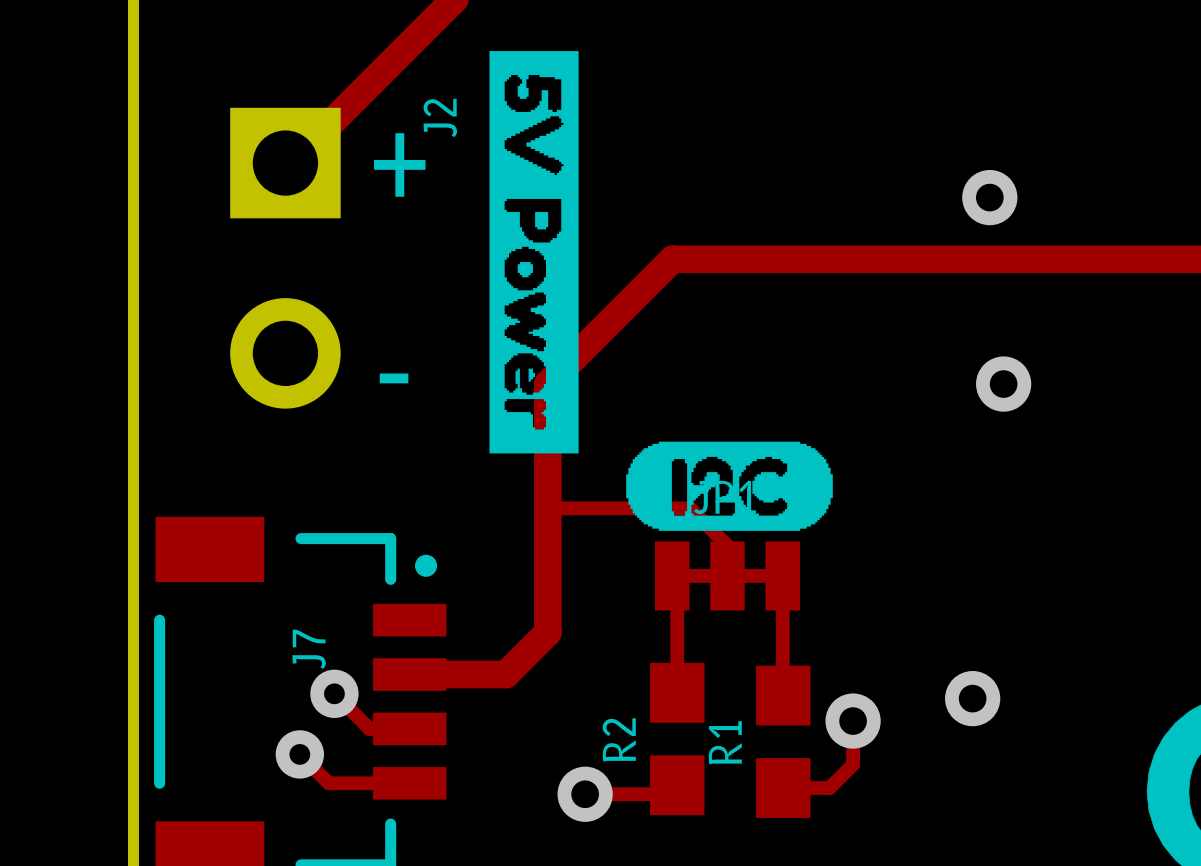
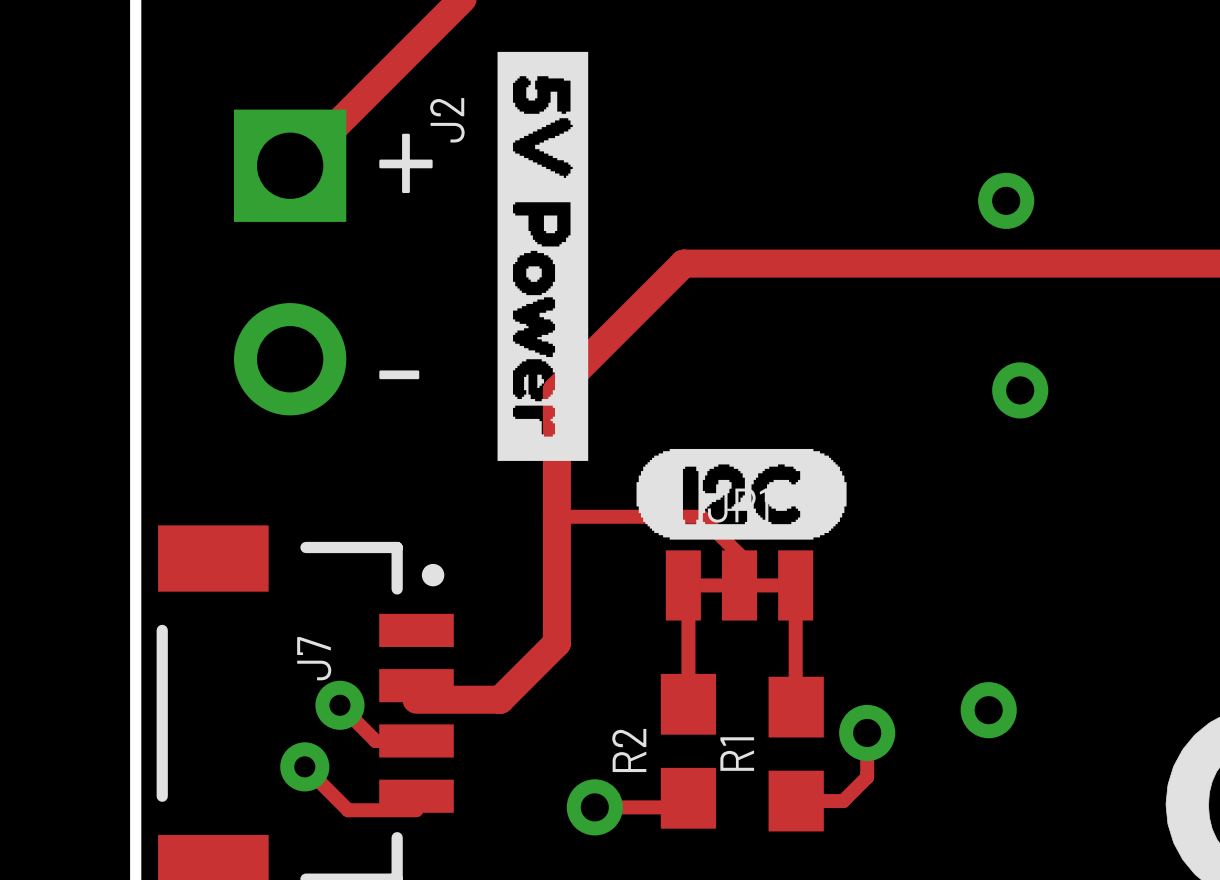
track: (409, 674) (505, 674) -> (416, 699) (500, 699) (514, 685)
track: (328, 783) (409, 783) -> (334, 796) (348, 810) (416, 810)

